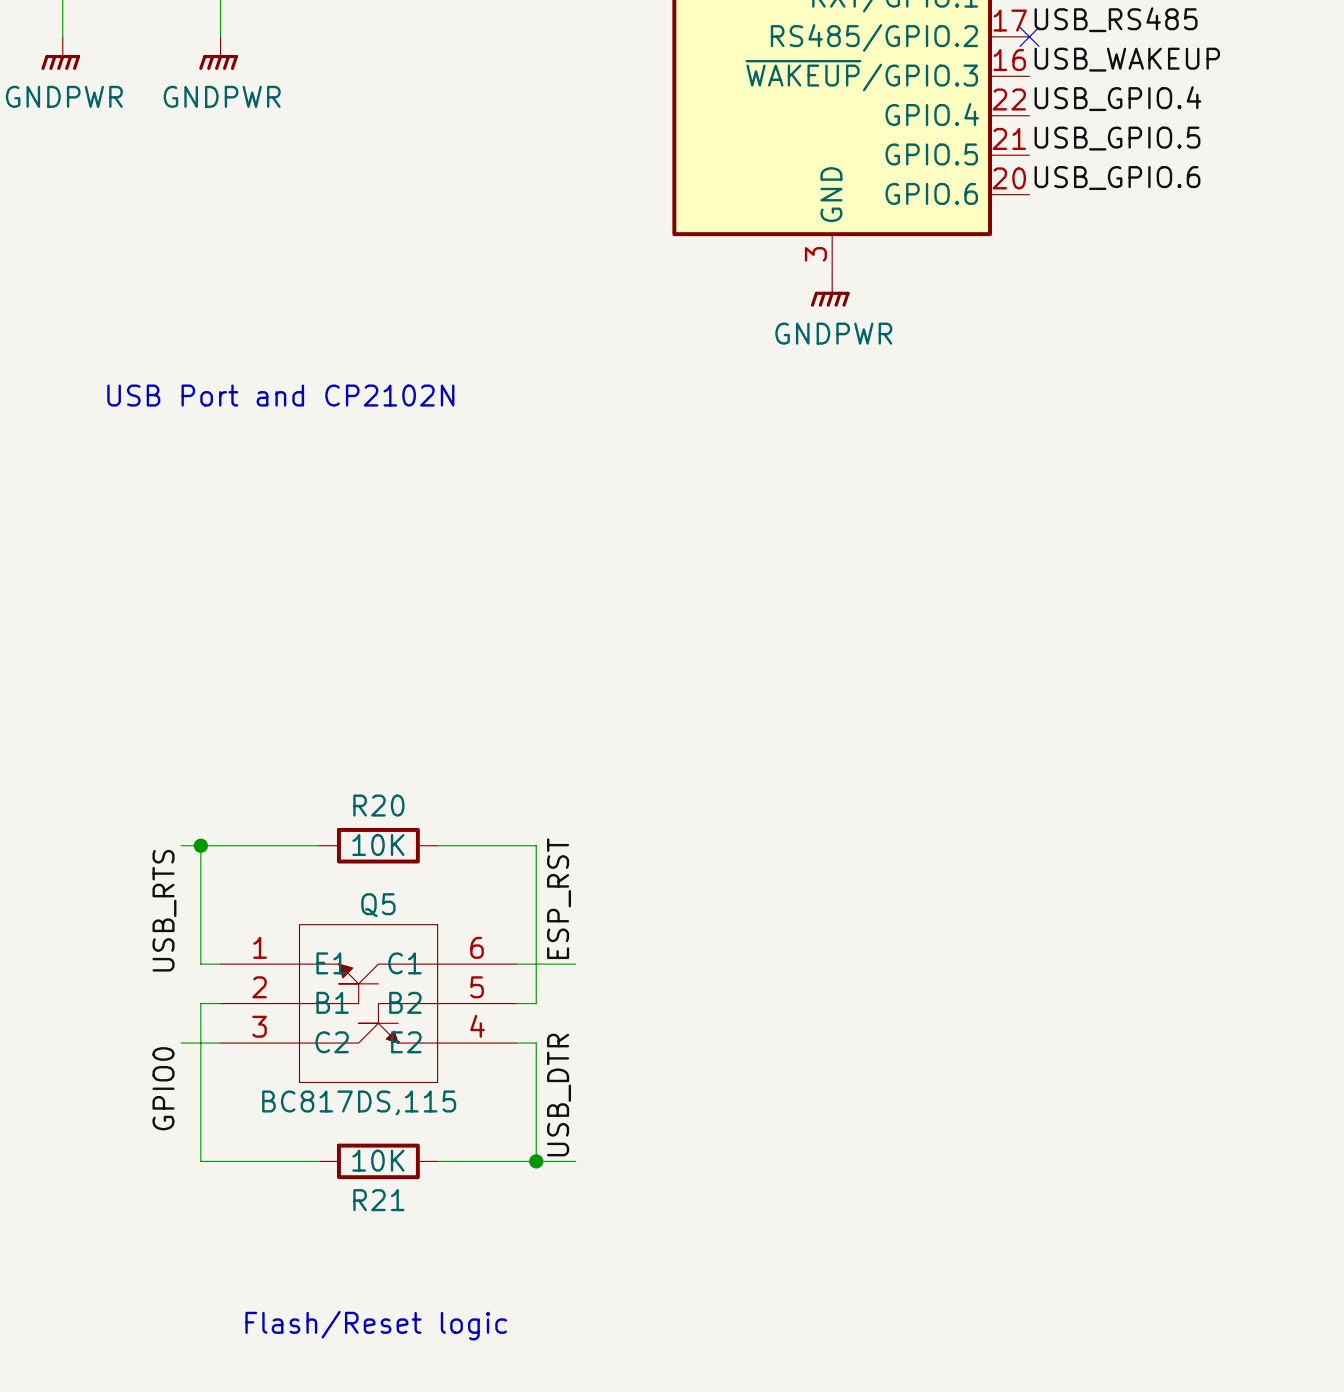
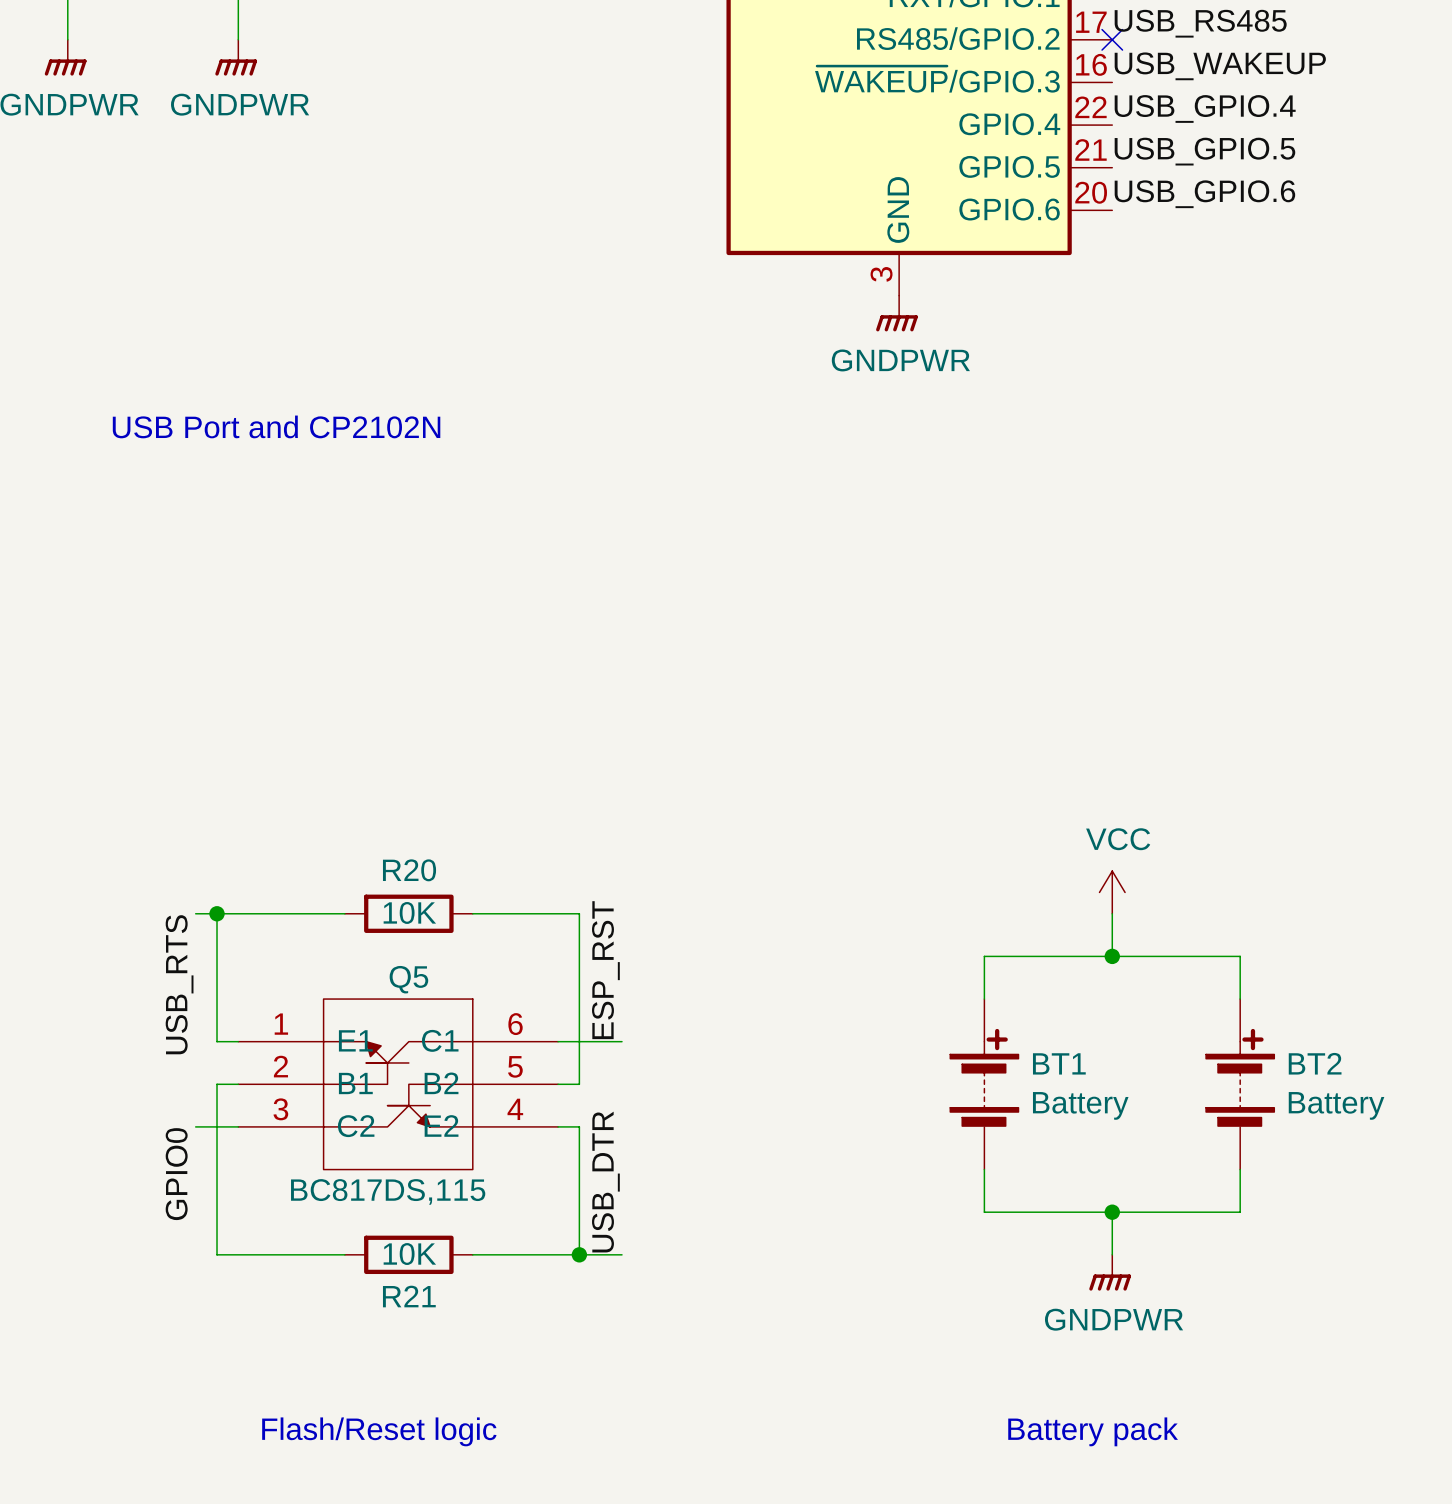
power symbol: none -> VCC (1112, 892)
wire: none -> (1112, 913) (1112, 956)
junction: none -> (1112, 956)
wire: none -> (984, 999) (984, 956) (1240, 956) (1240, 999)
BT1: none -> Battery (984, 1084)
BT2: none -> Battery (1240, 1084)
wire: none -> (984, 1169) (984, 1212) (1240, 1212) (1240, 1169)
wire: none -> (1112, 1212) (1112, 1254)
junction: none -> (1112, 1212)
power symbol: none -> GNDPWR (1110, 1272)
text: none -> Battery pack (1093, 1431)

